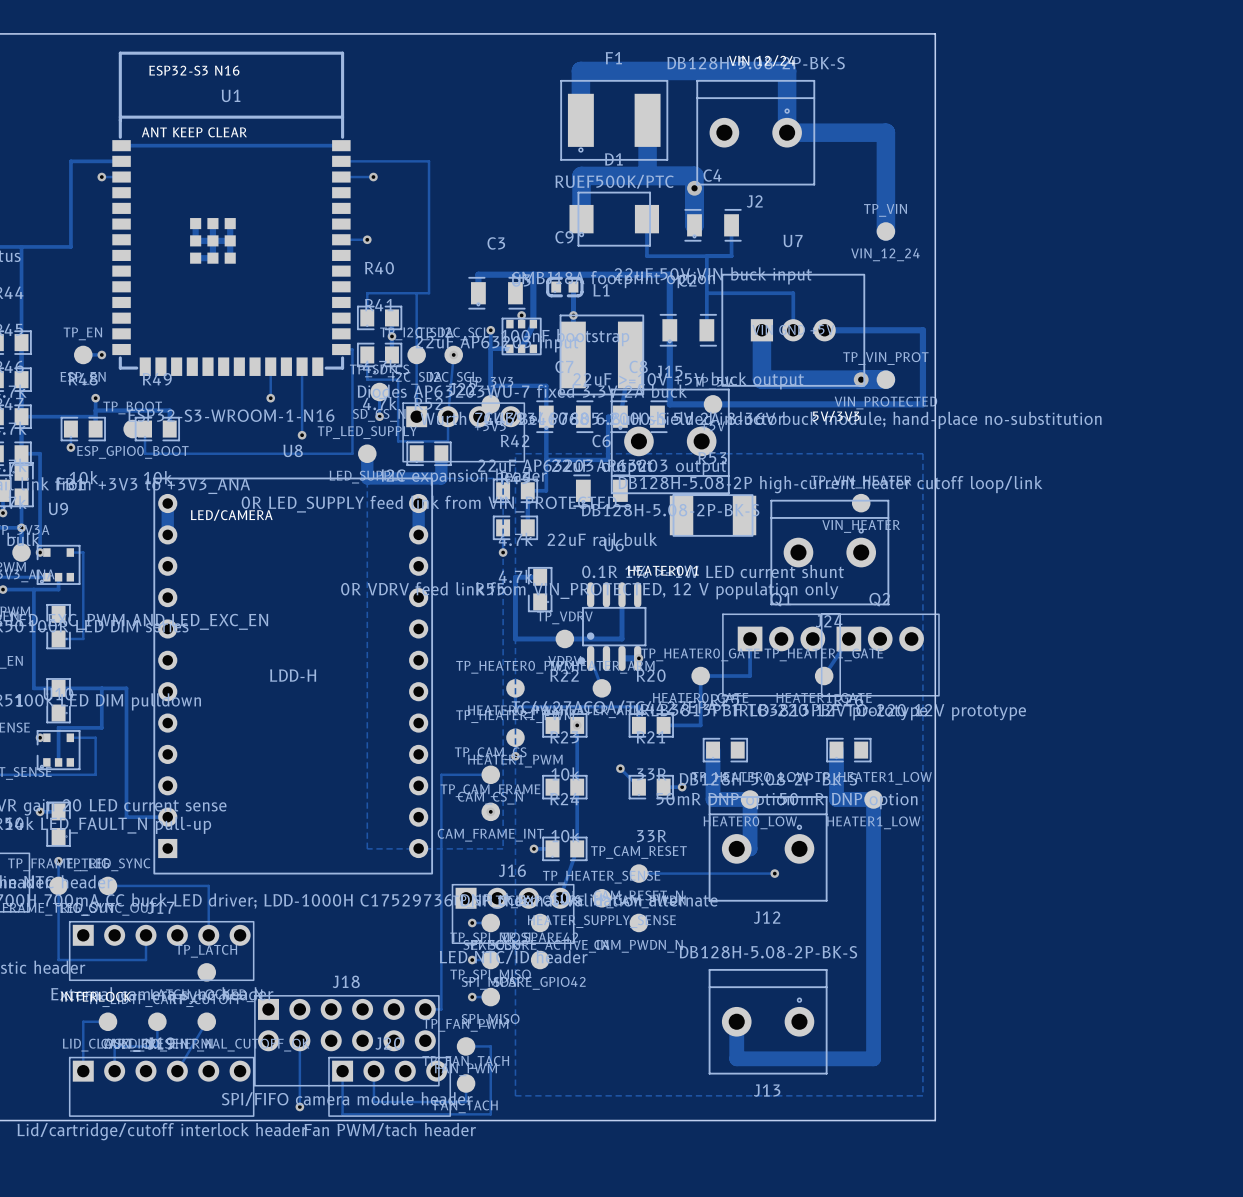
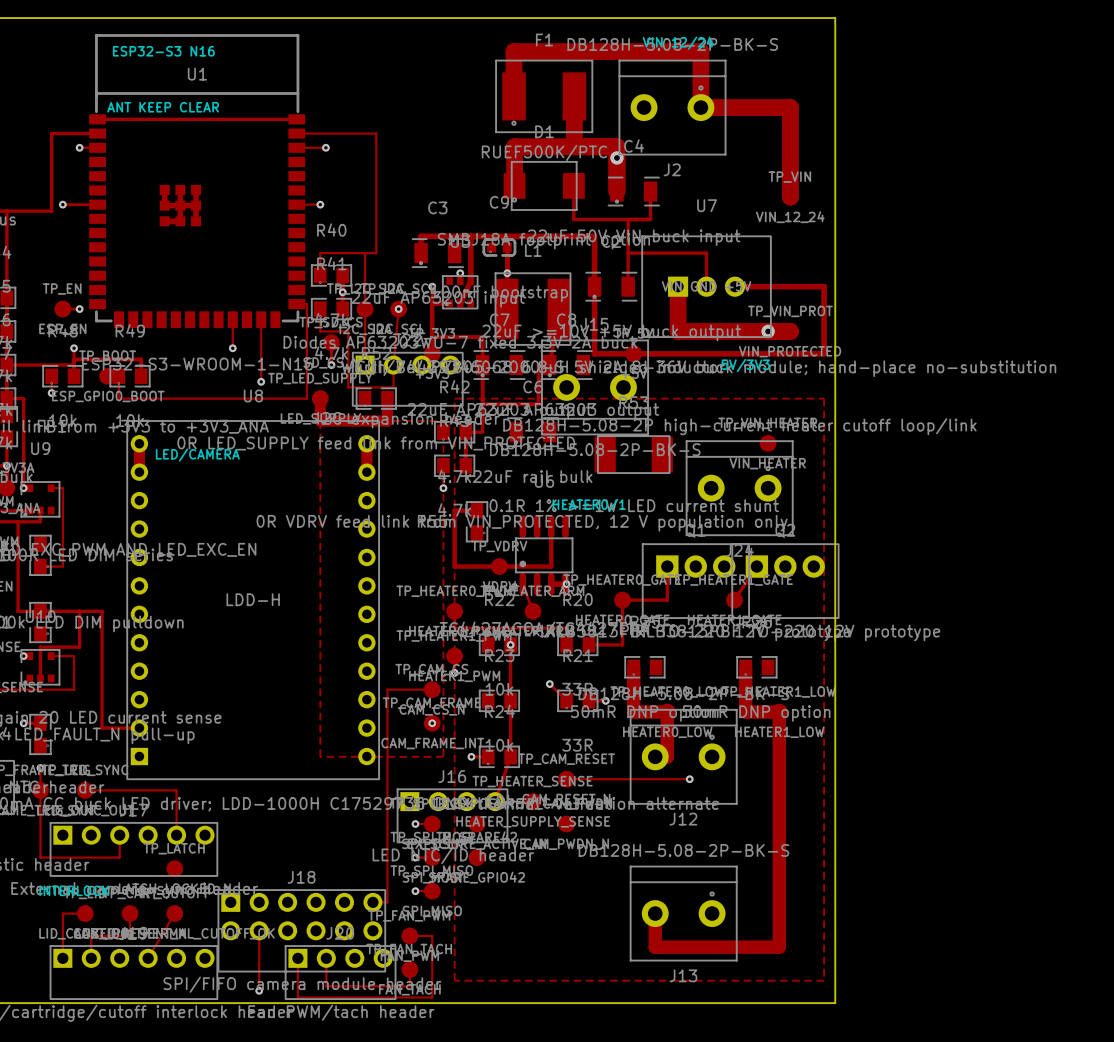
track: none -> (62, 204) (97, 204)
via: none -> (62, 204)

